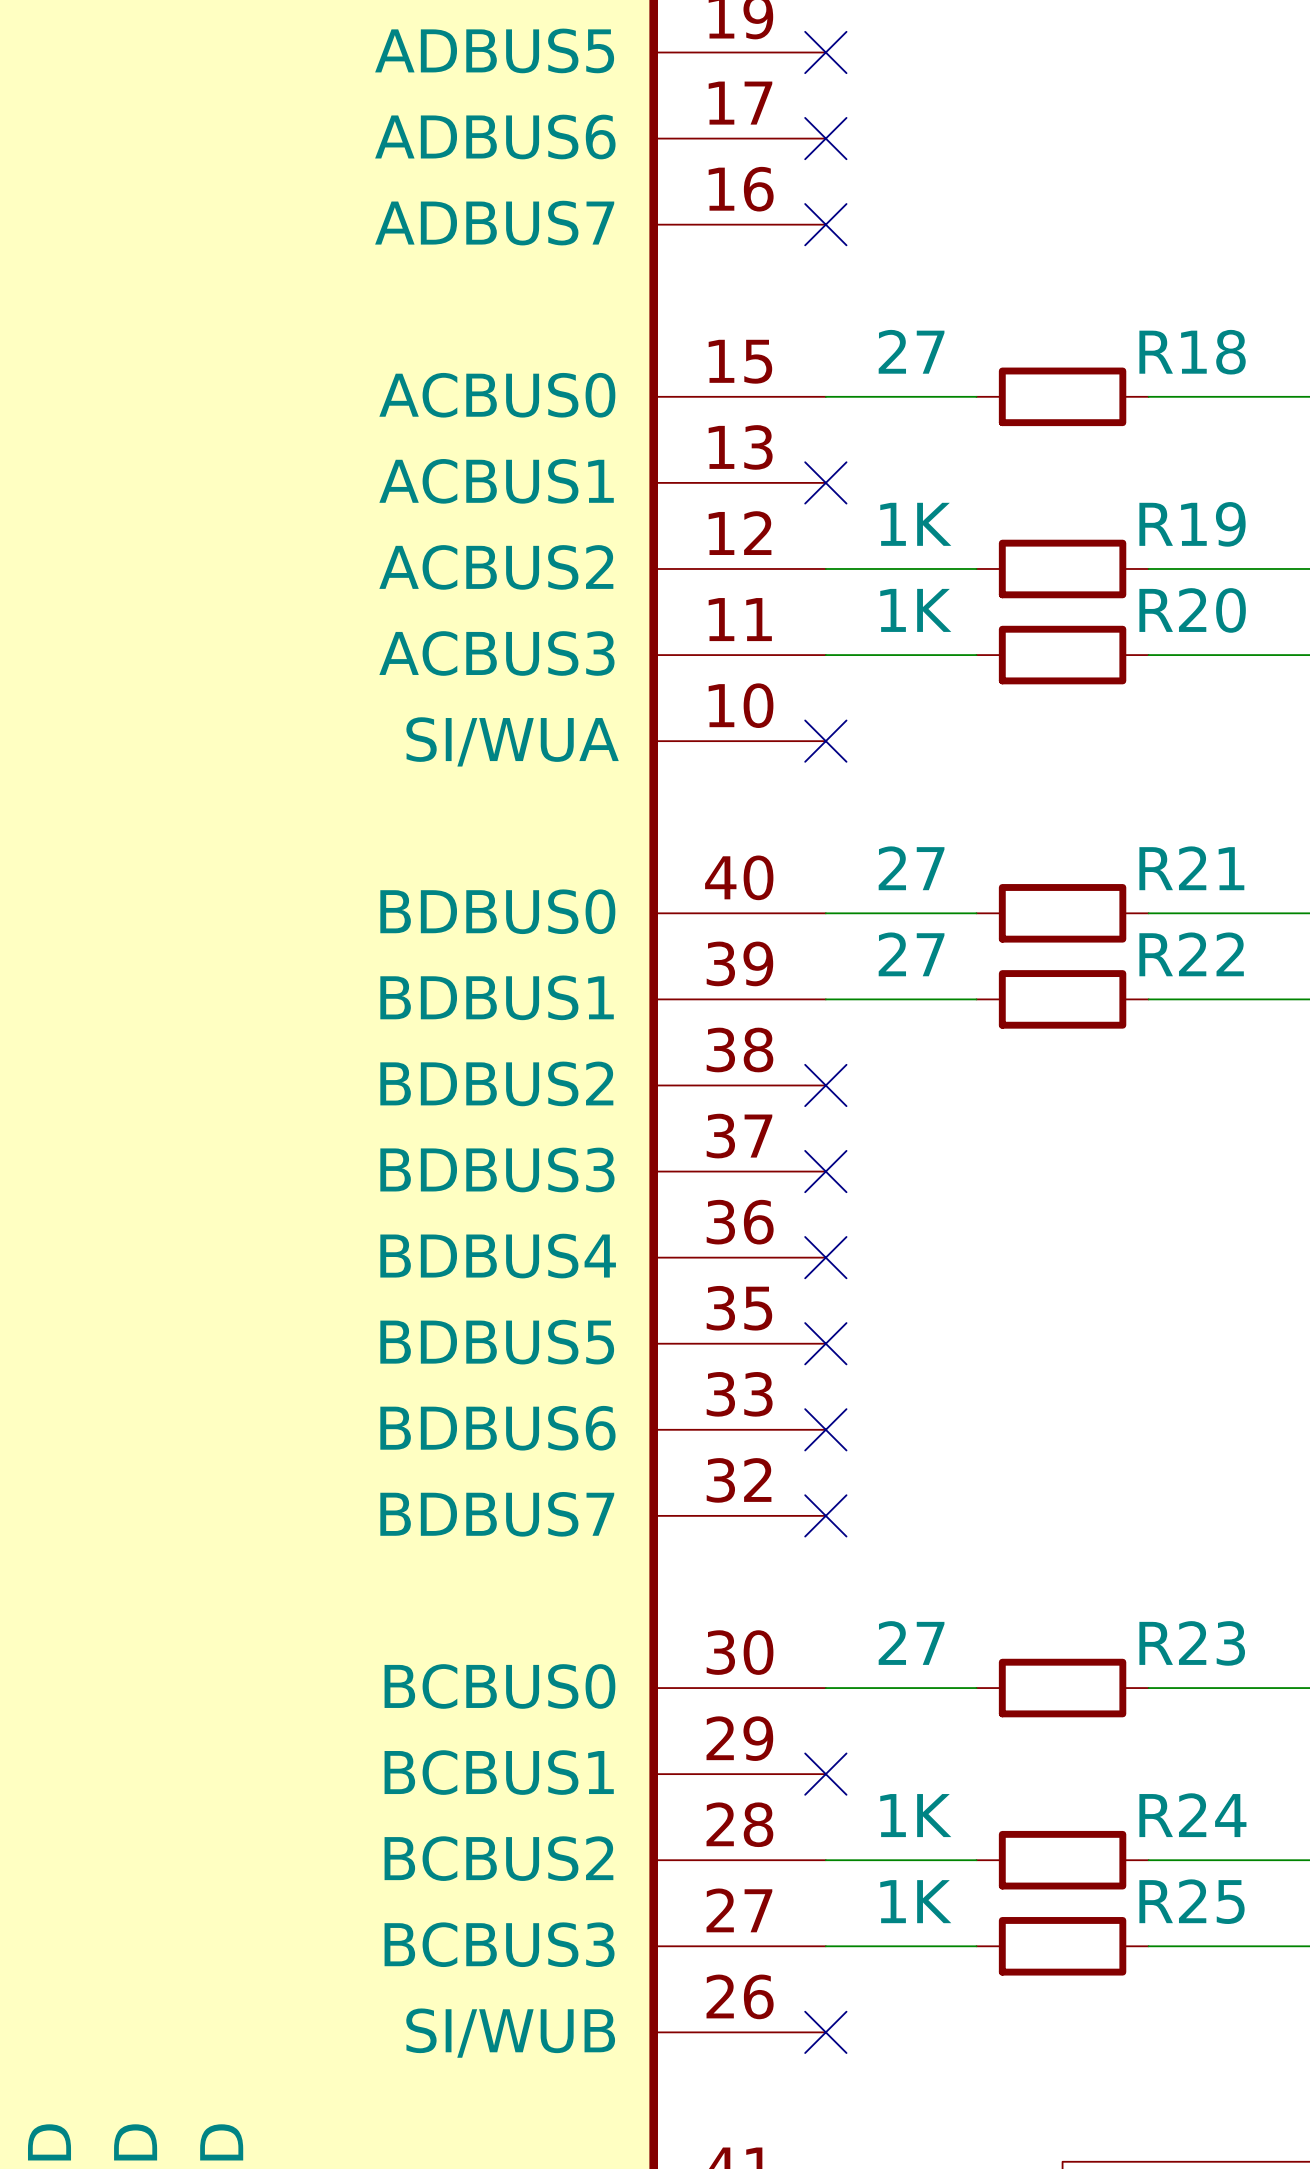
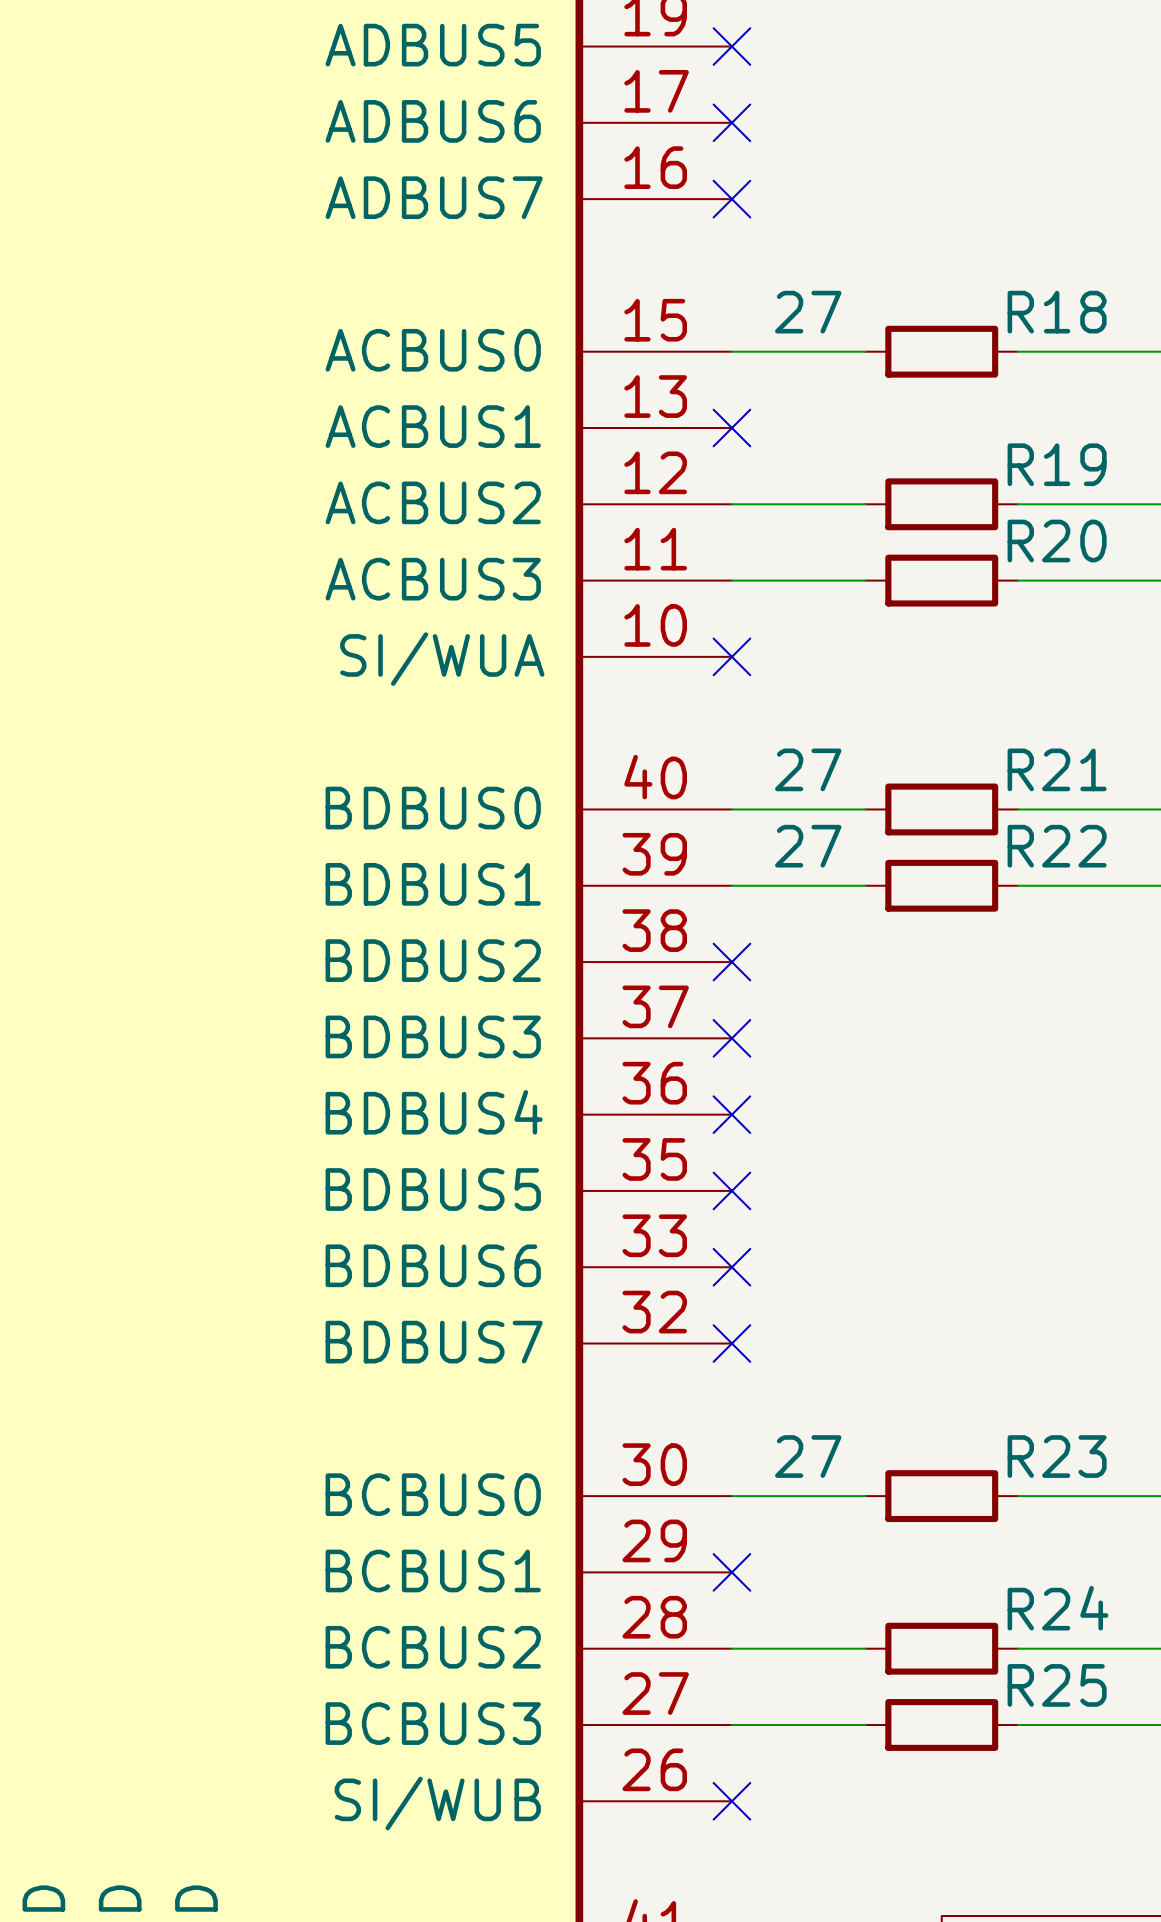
R19 value: 1K (915, 524) -> none
R20 value: 1K (915, 610) -> none
R24 value: 1K (915, 1815) -> none
R25 value: 1K (915, 1901) -> none

